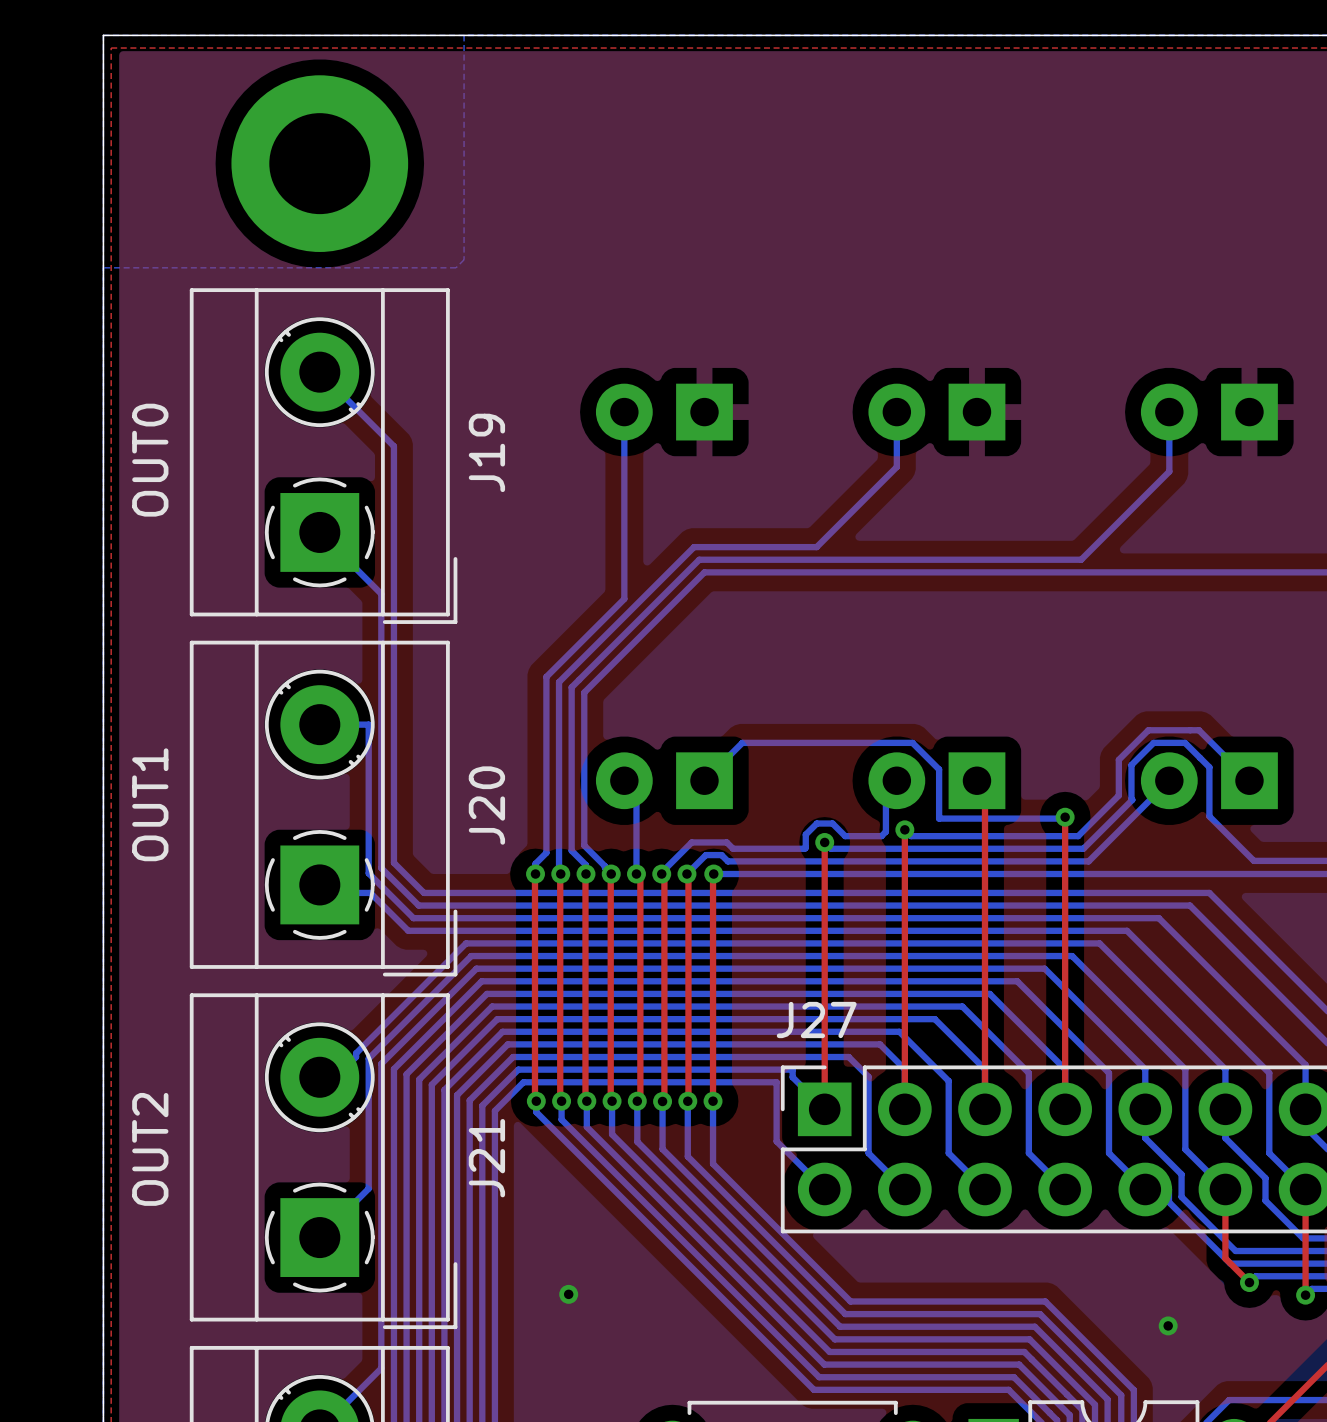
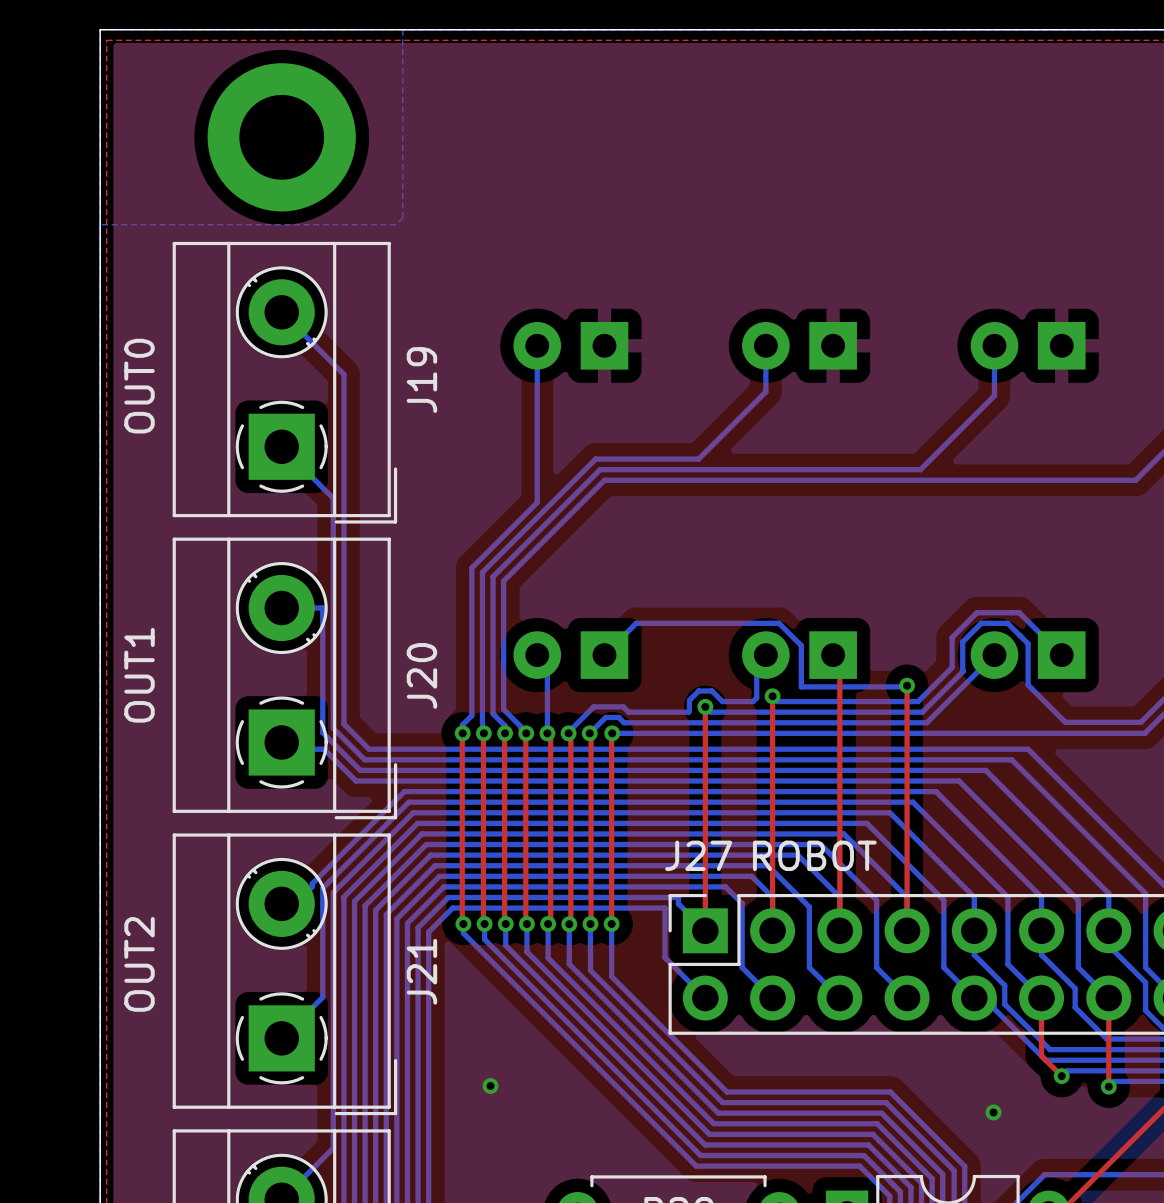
J27 value: none -> ROBOT (814, 855)

